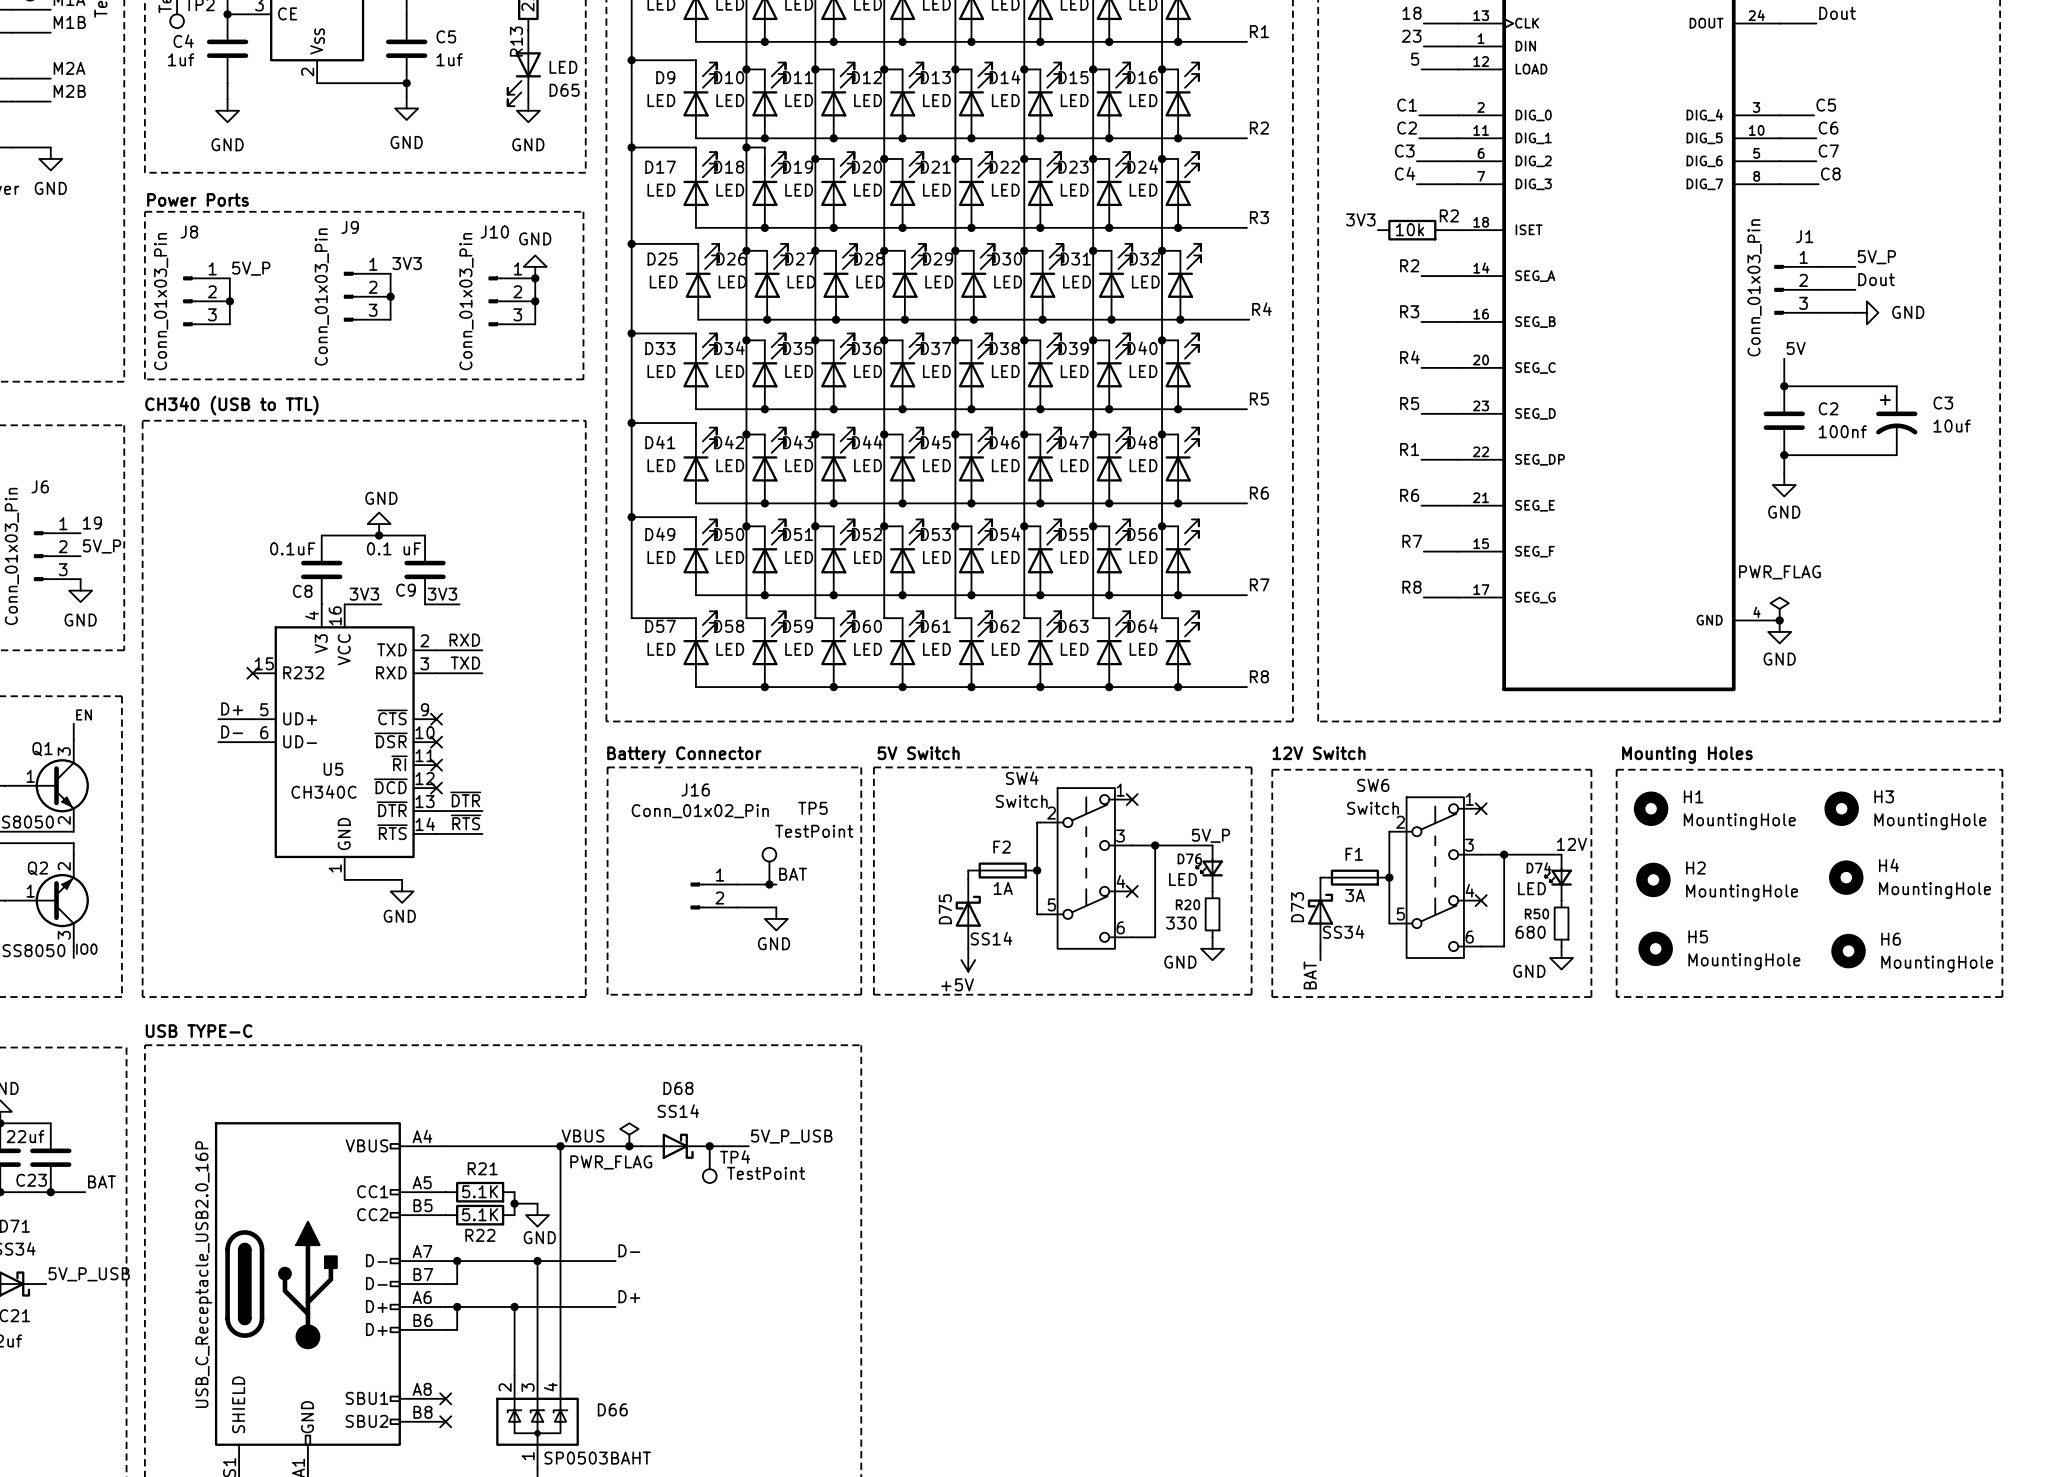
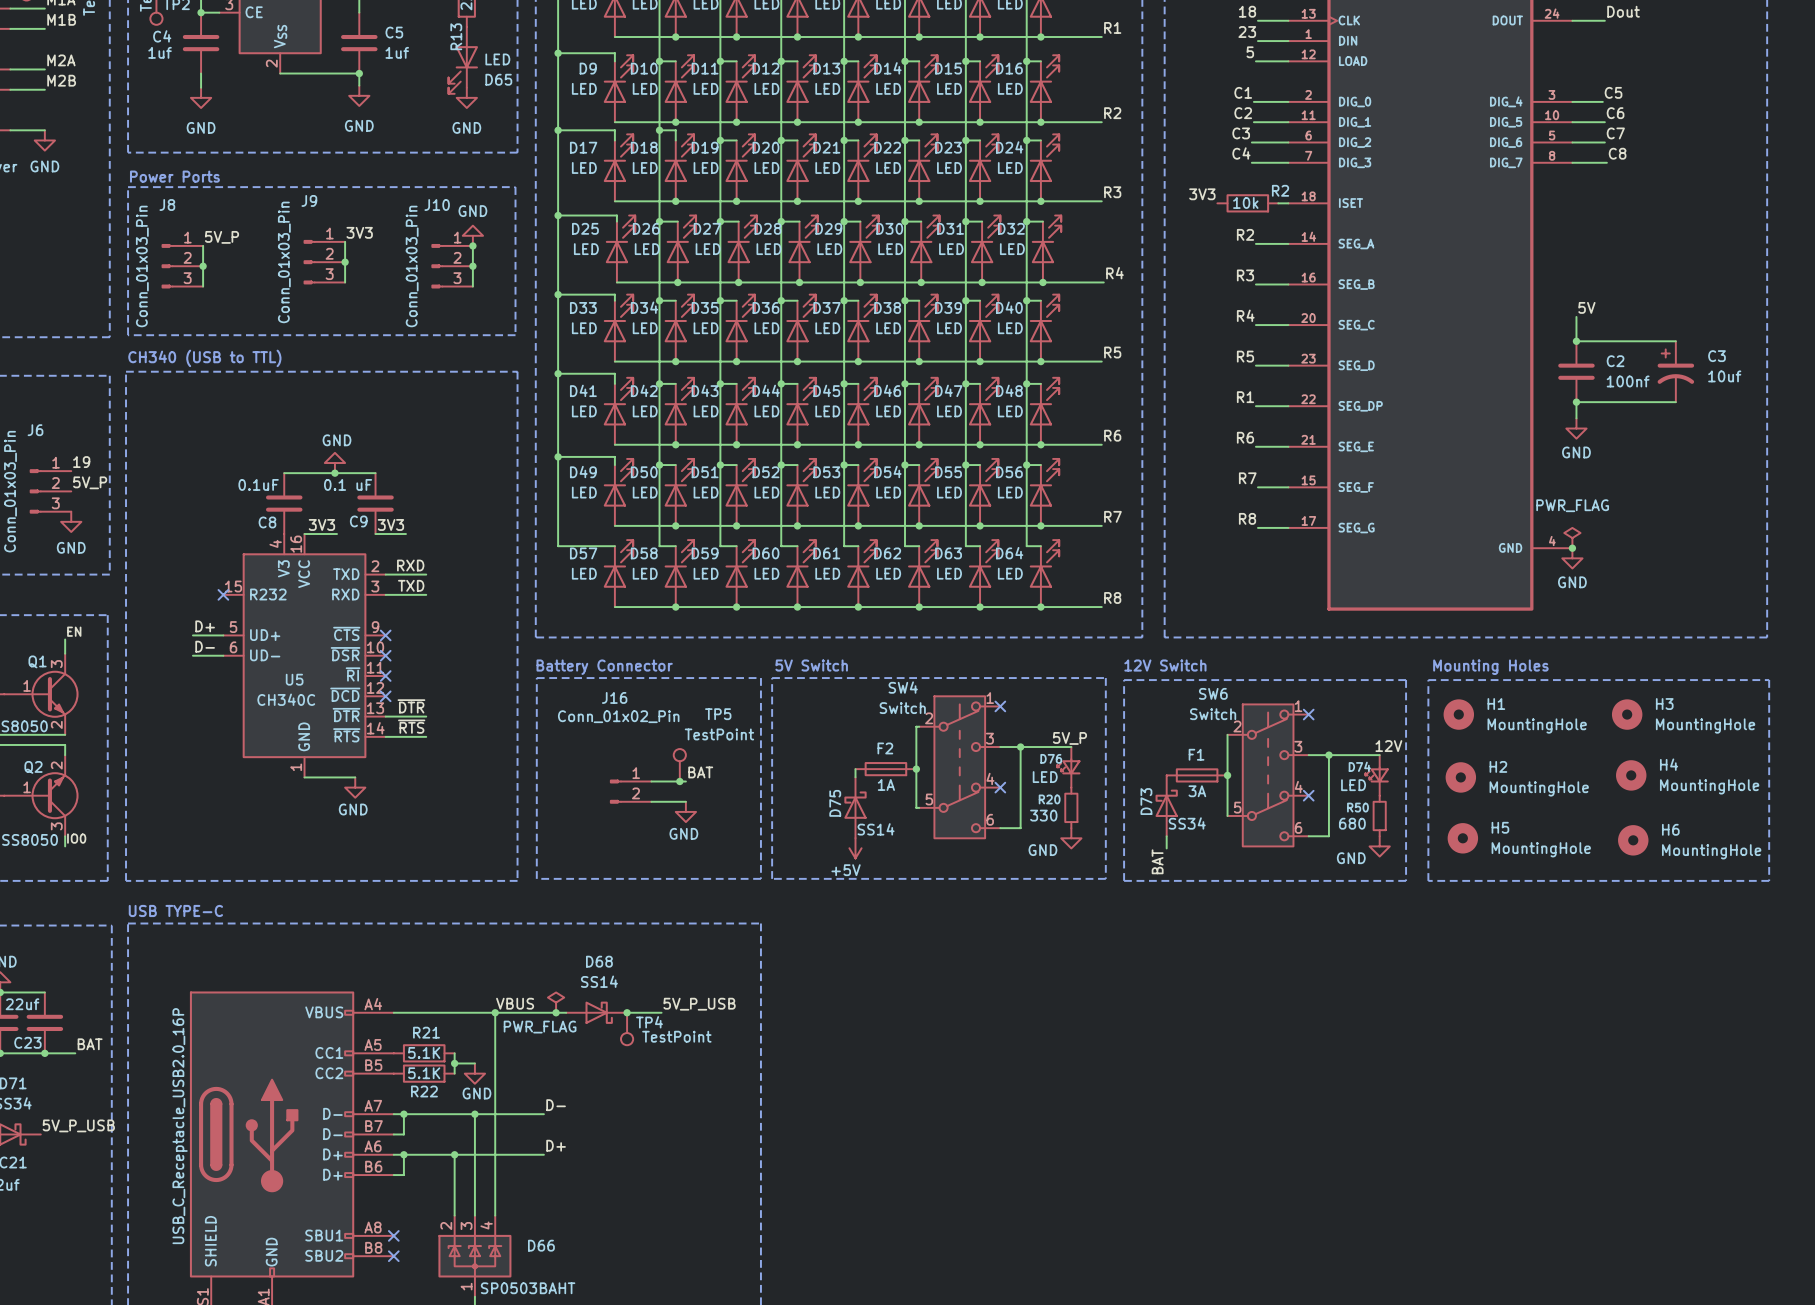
label: 5V_P (1876, 257) -> none
wire: (1821, 266) (1855, 266) -> none
label: Dout (1876, 279) -> none
J1: Conn_01x03_Pin (1797, 289) -> none
wire: (1821, 289) (1855, 289) -> none
wire: (1821, 312) (1855, 312) -> none
power symbol: GND (1866, 312) -> none

